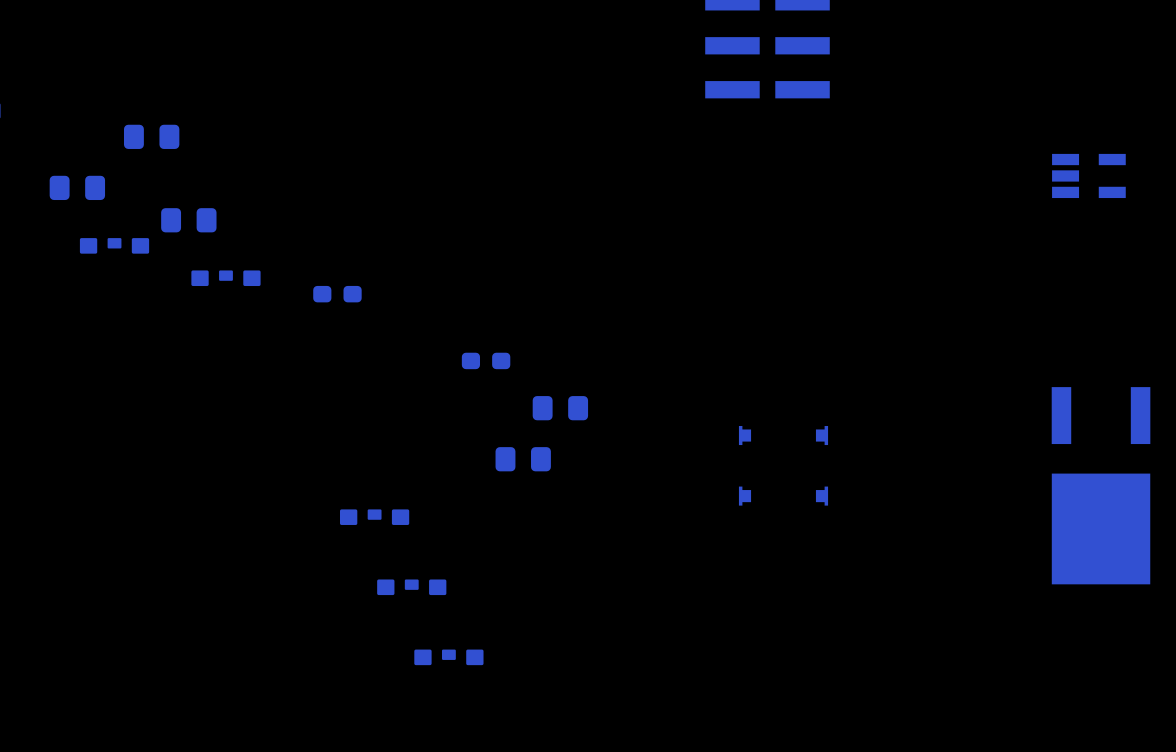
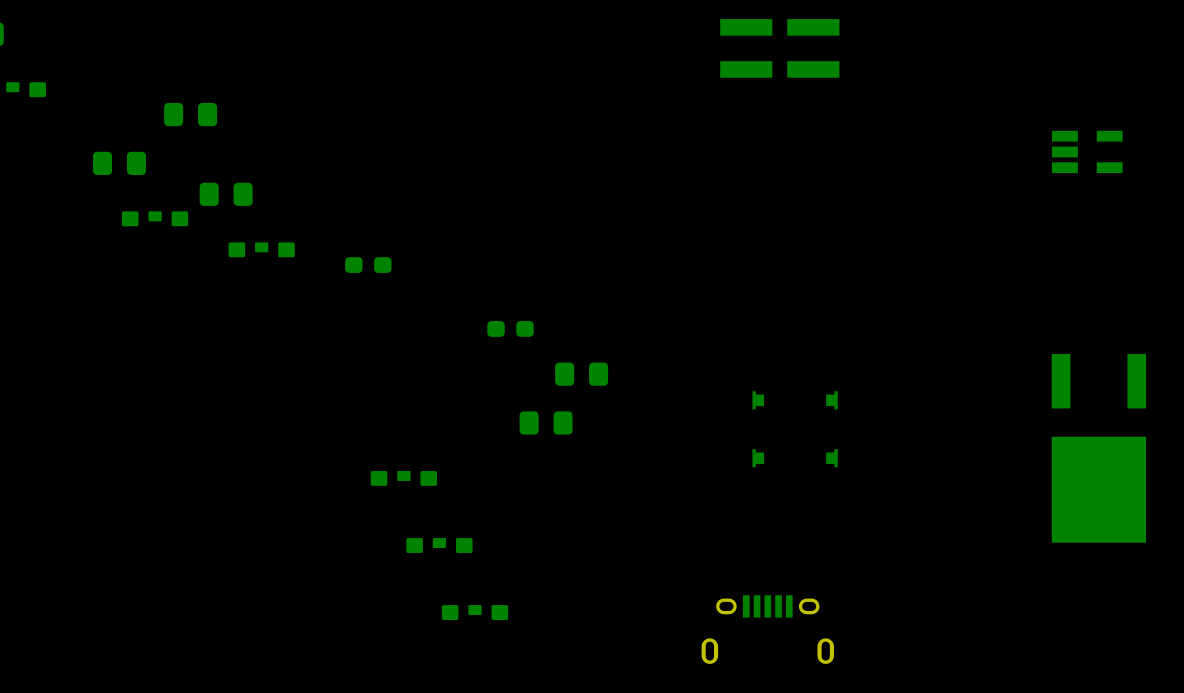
part: none -> (767, 629)

